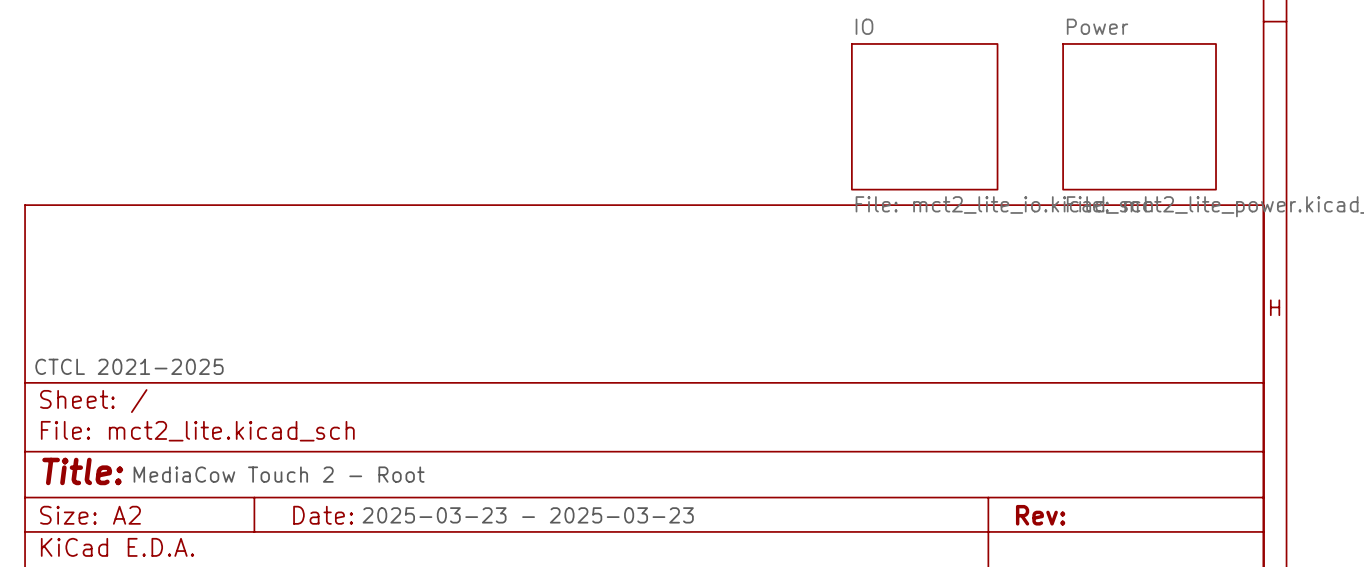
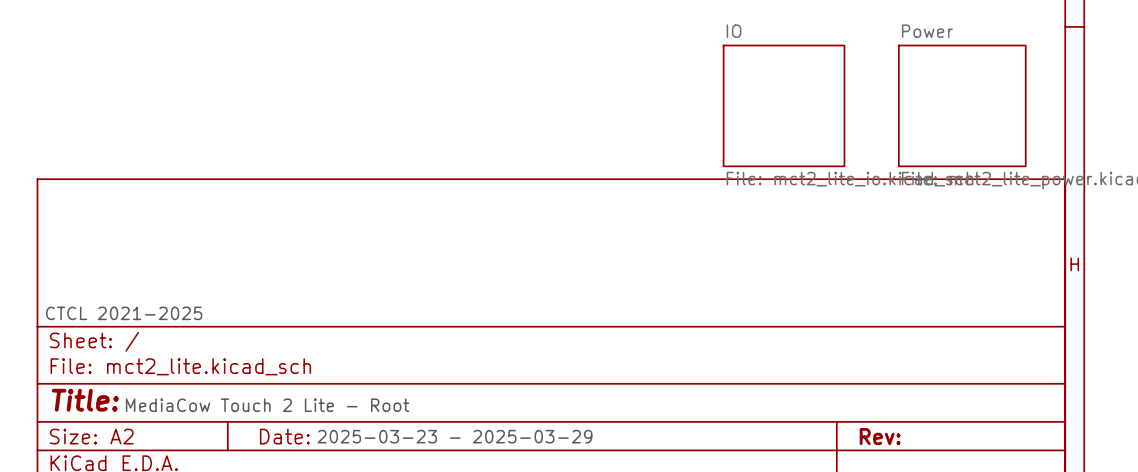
text: MediaCow Touch 2 - Root (279, 474) -> MediaCow Touch 2 Lite - Root (267, 405)
text: 2025-03-23 - 2025-03-23 (528, 515) -> 2025-03-23 - 2025-03-29 (454, 436)

